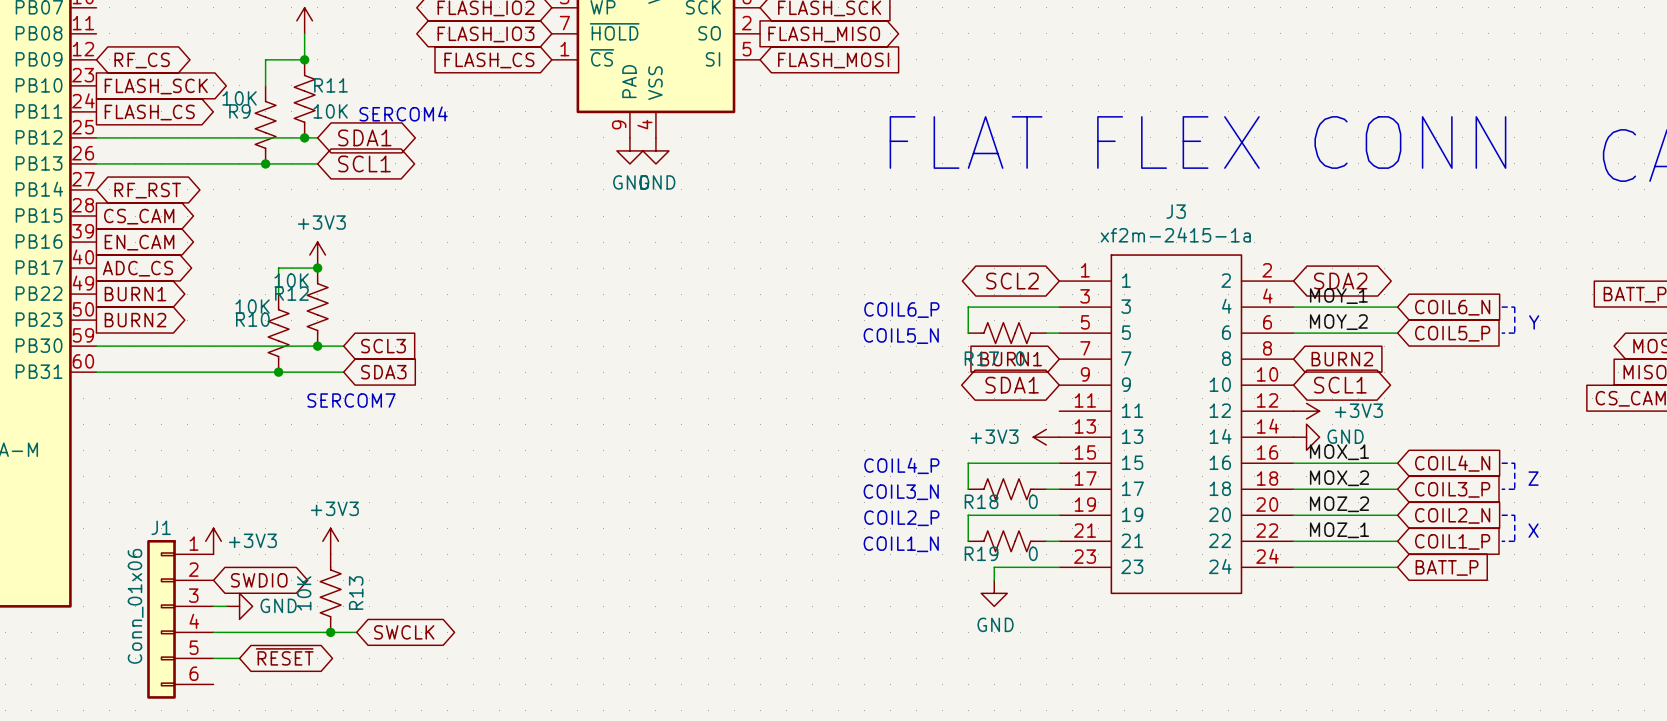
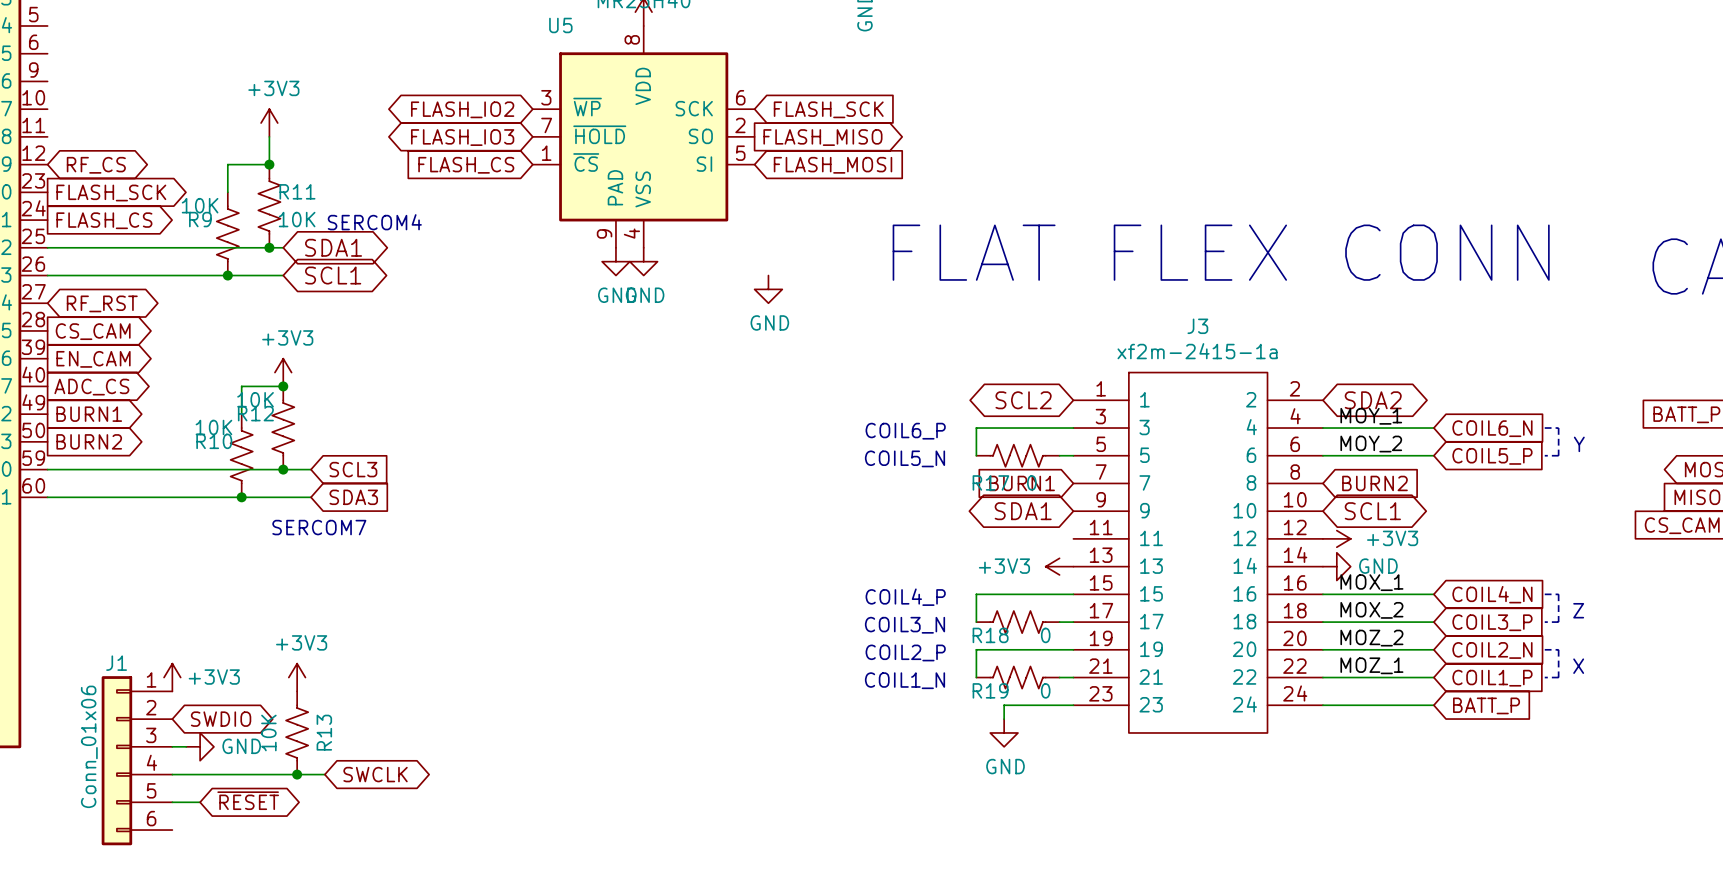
power symbol: none -> GND (768, 289)

